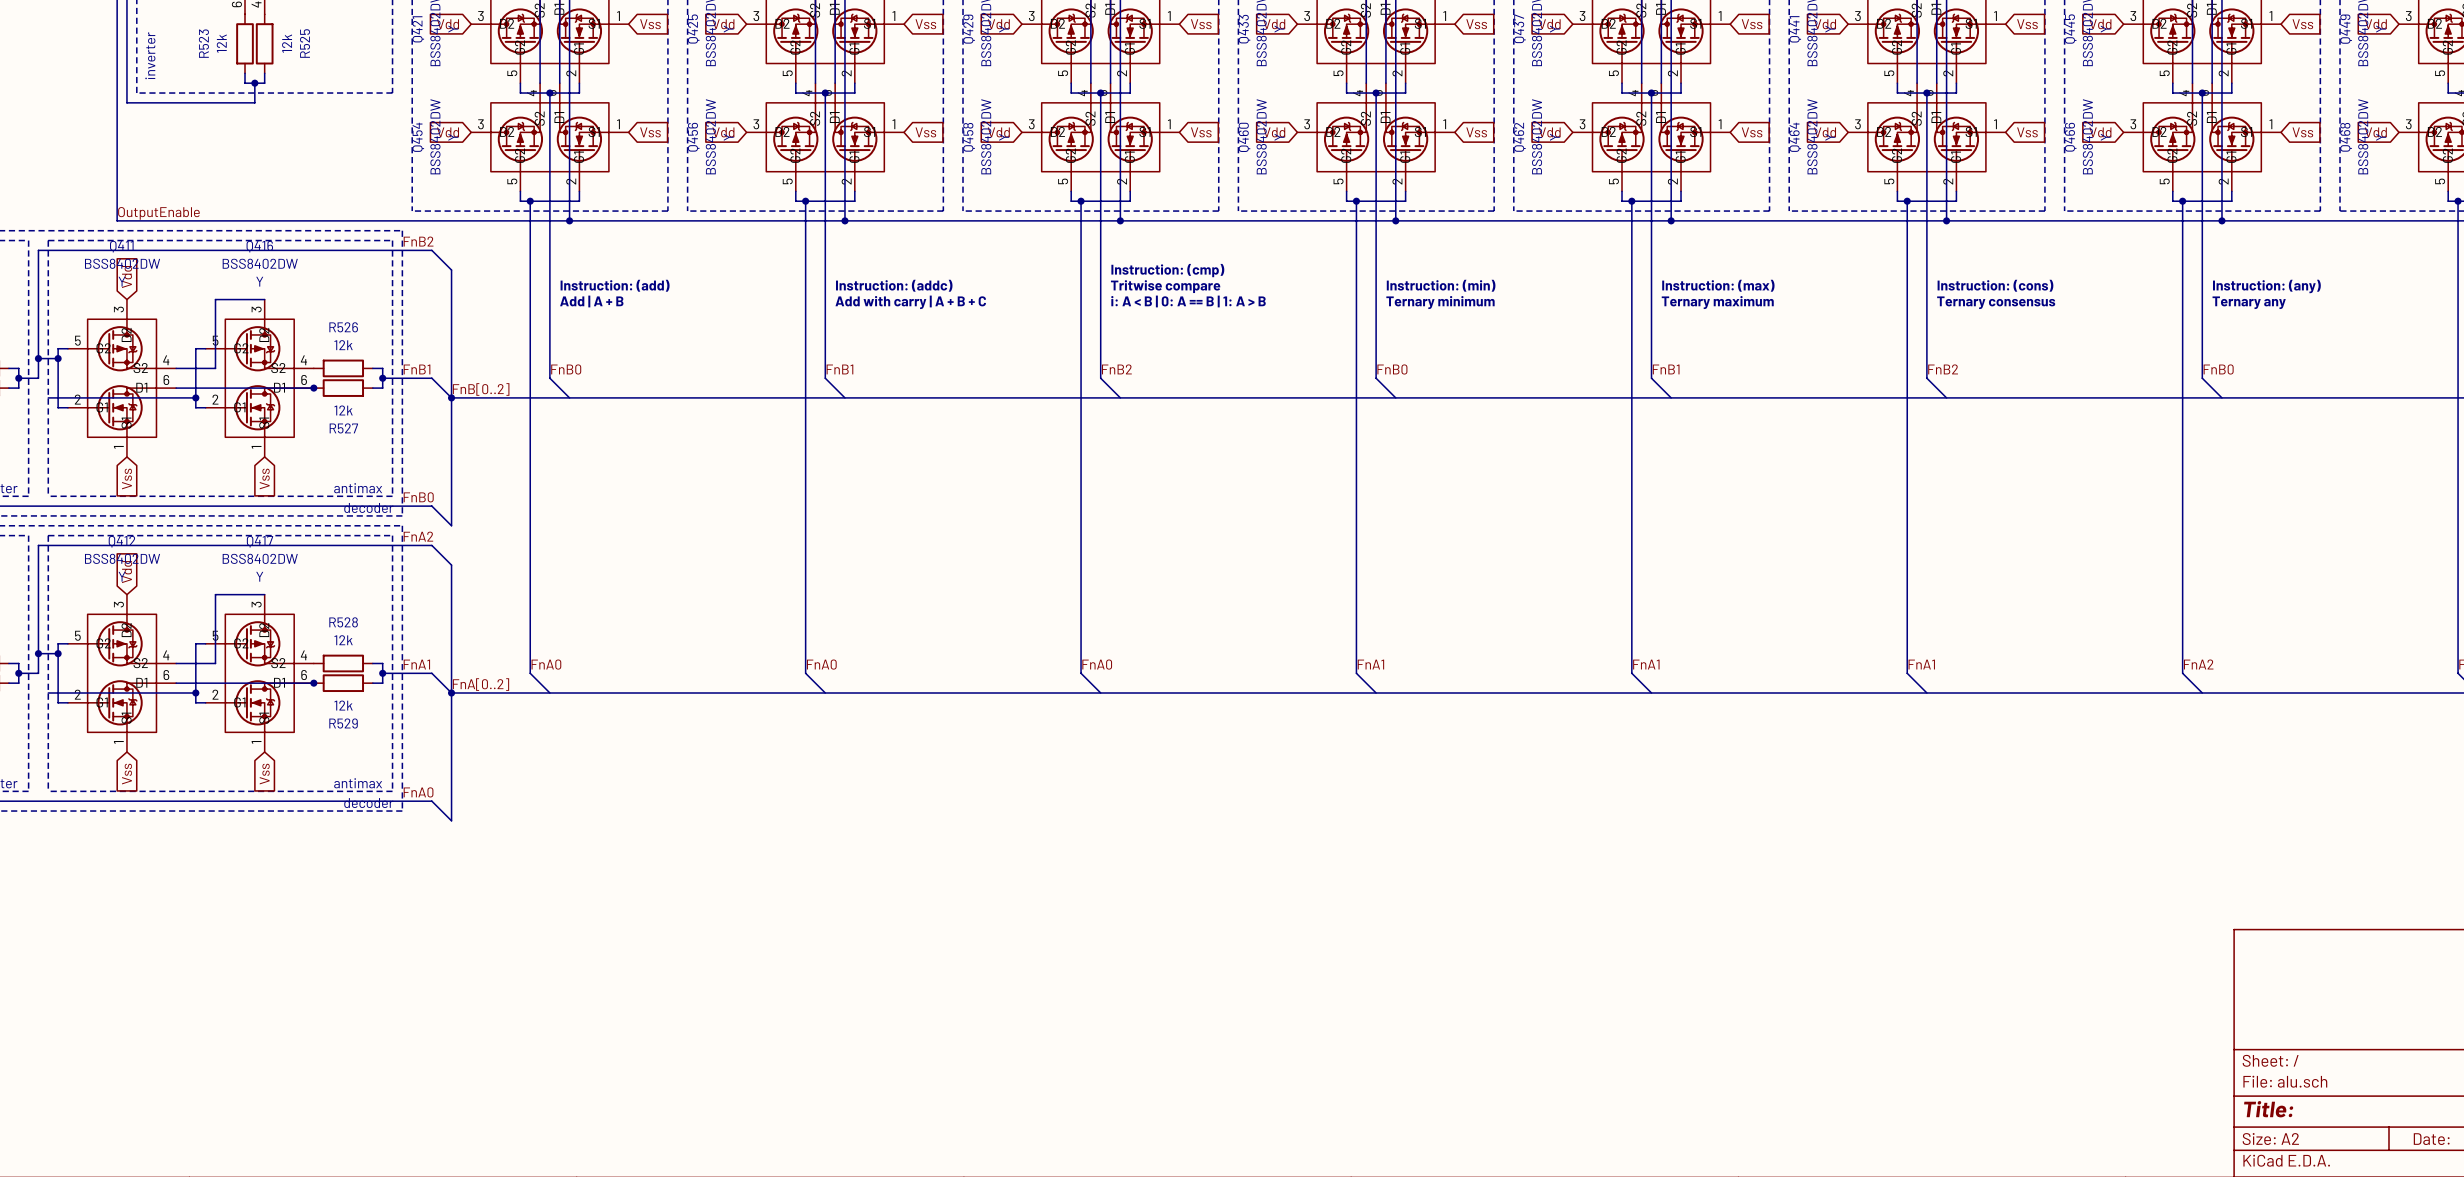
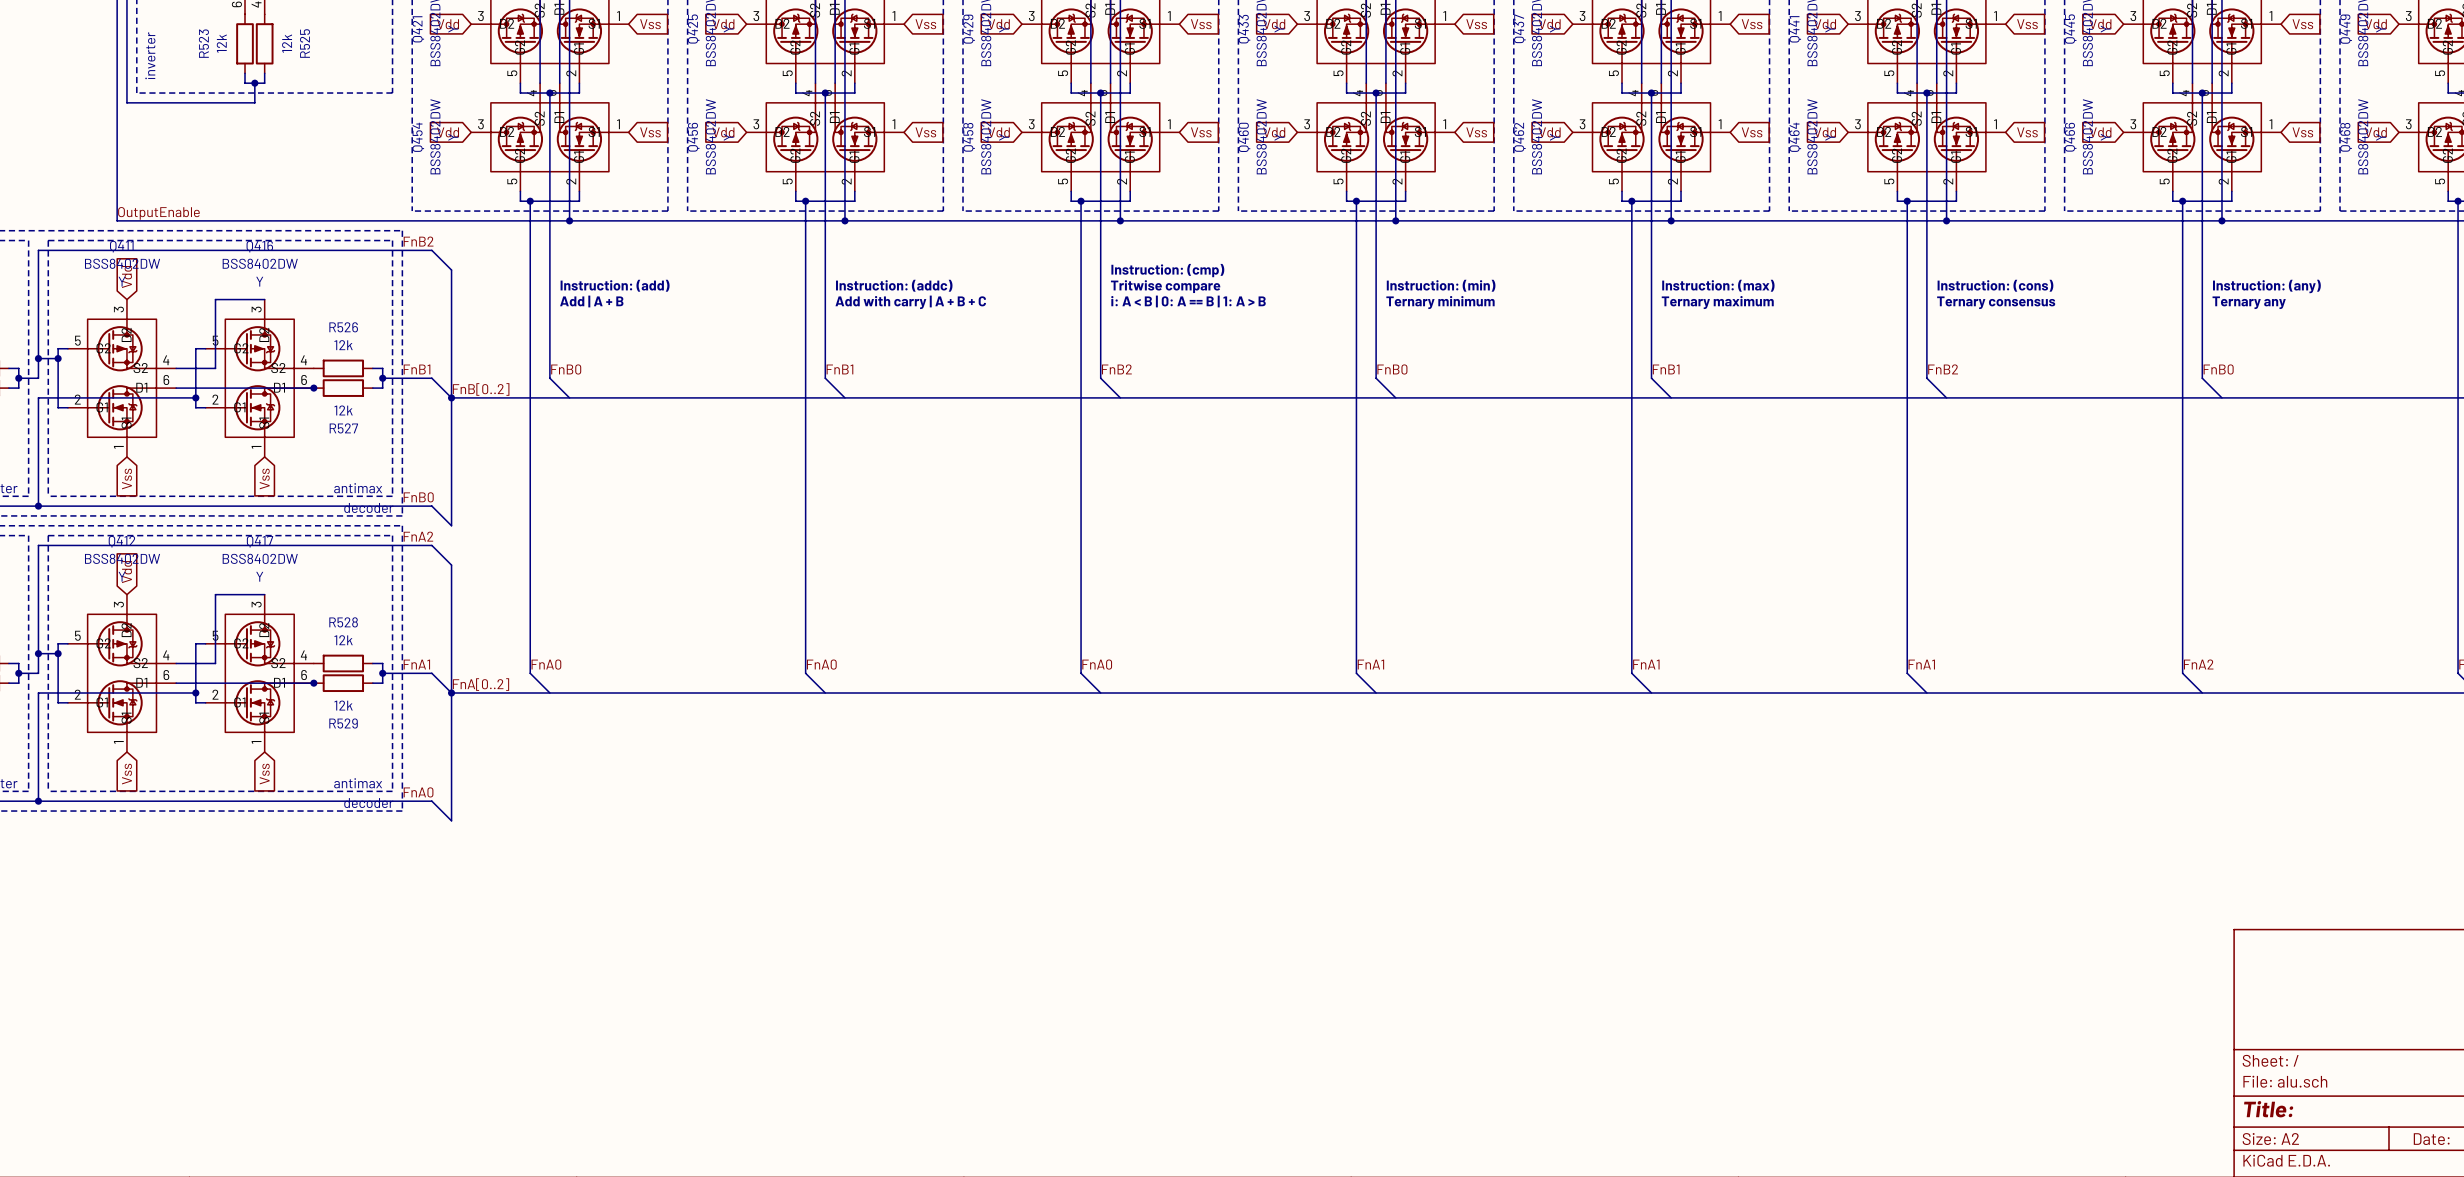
wire: none -> (48, 397) (38, 397) (38, 506)
junction: none -> (38, 506)
wire: none -> (48, 693) (38, 693) (38, 801)
junction: none -> (38, 801)

